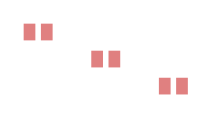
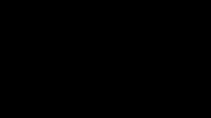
part: (38, 32) -> none
part: (105, 59) -> none
part: (173, 86) -> none

